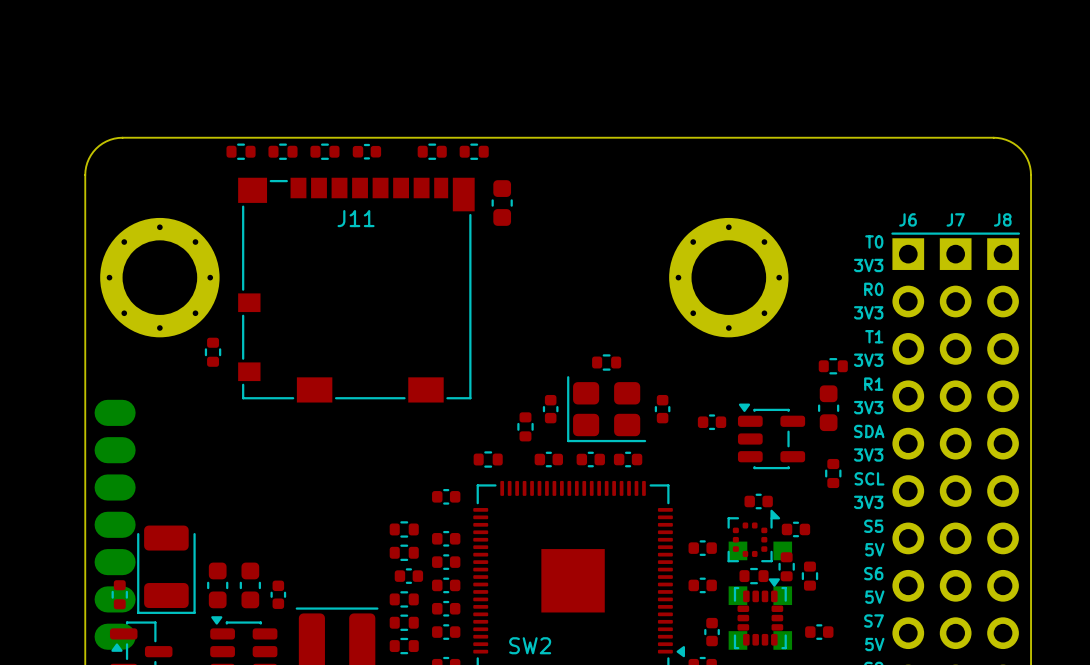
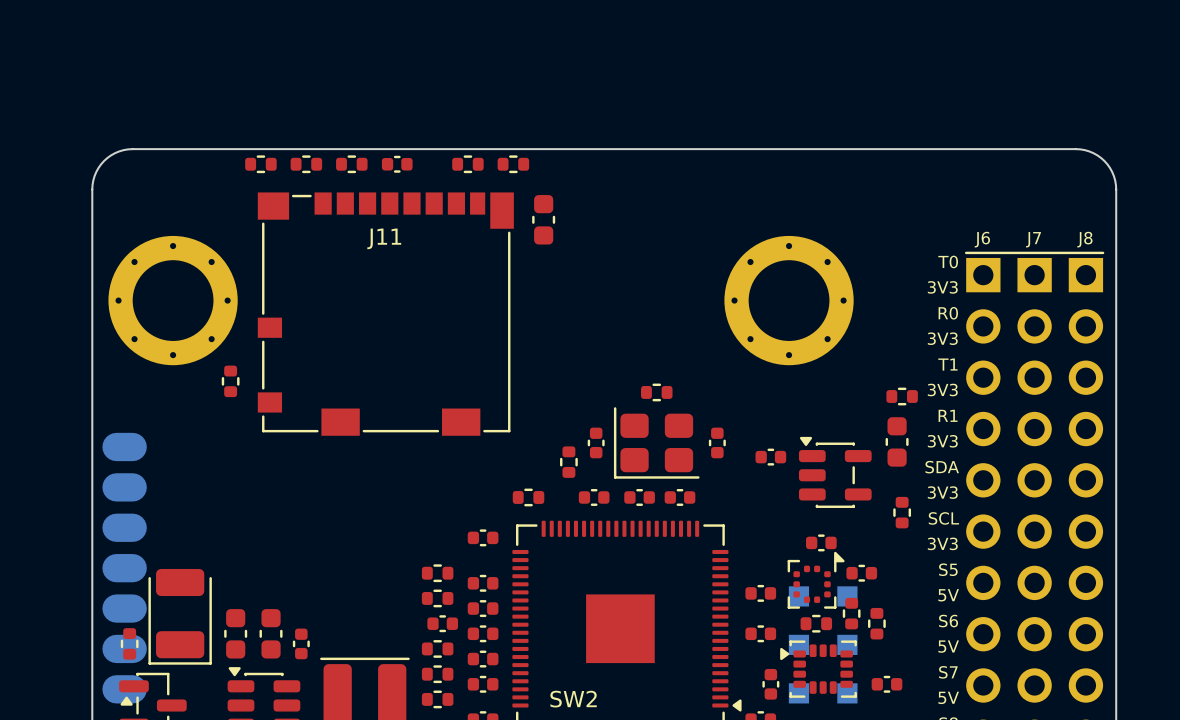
part rotation: 0° (760, 613) -> 90° counterclockwise (818, 669)

